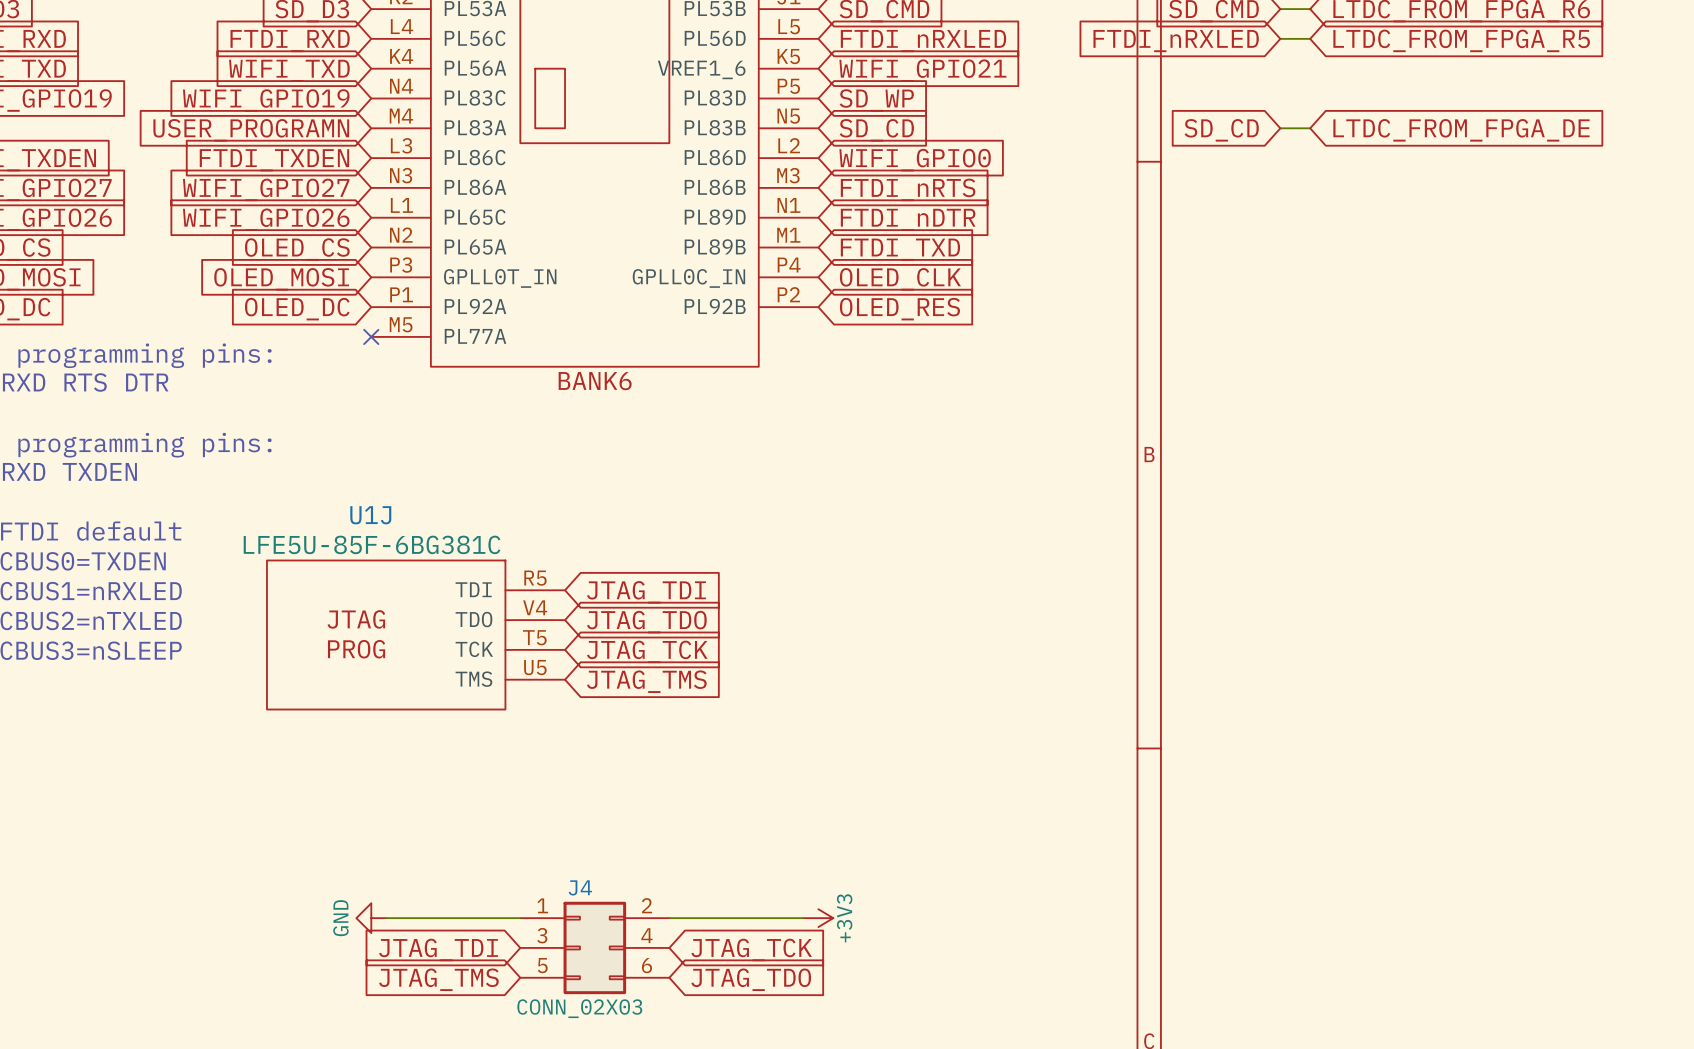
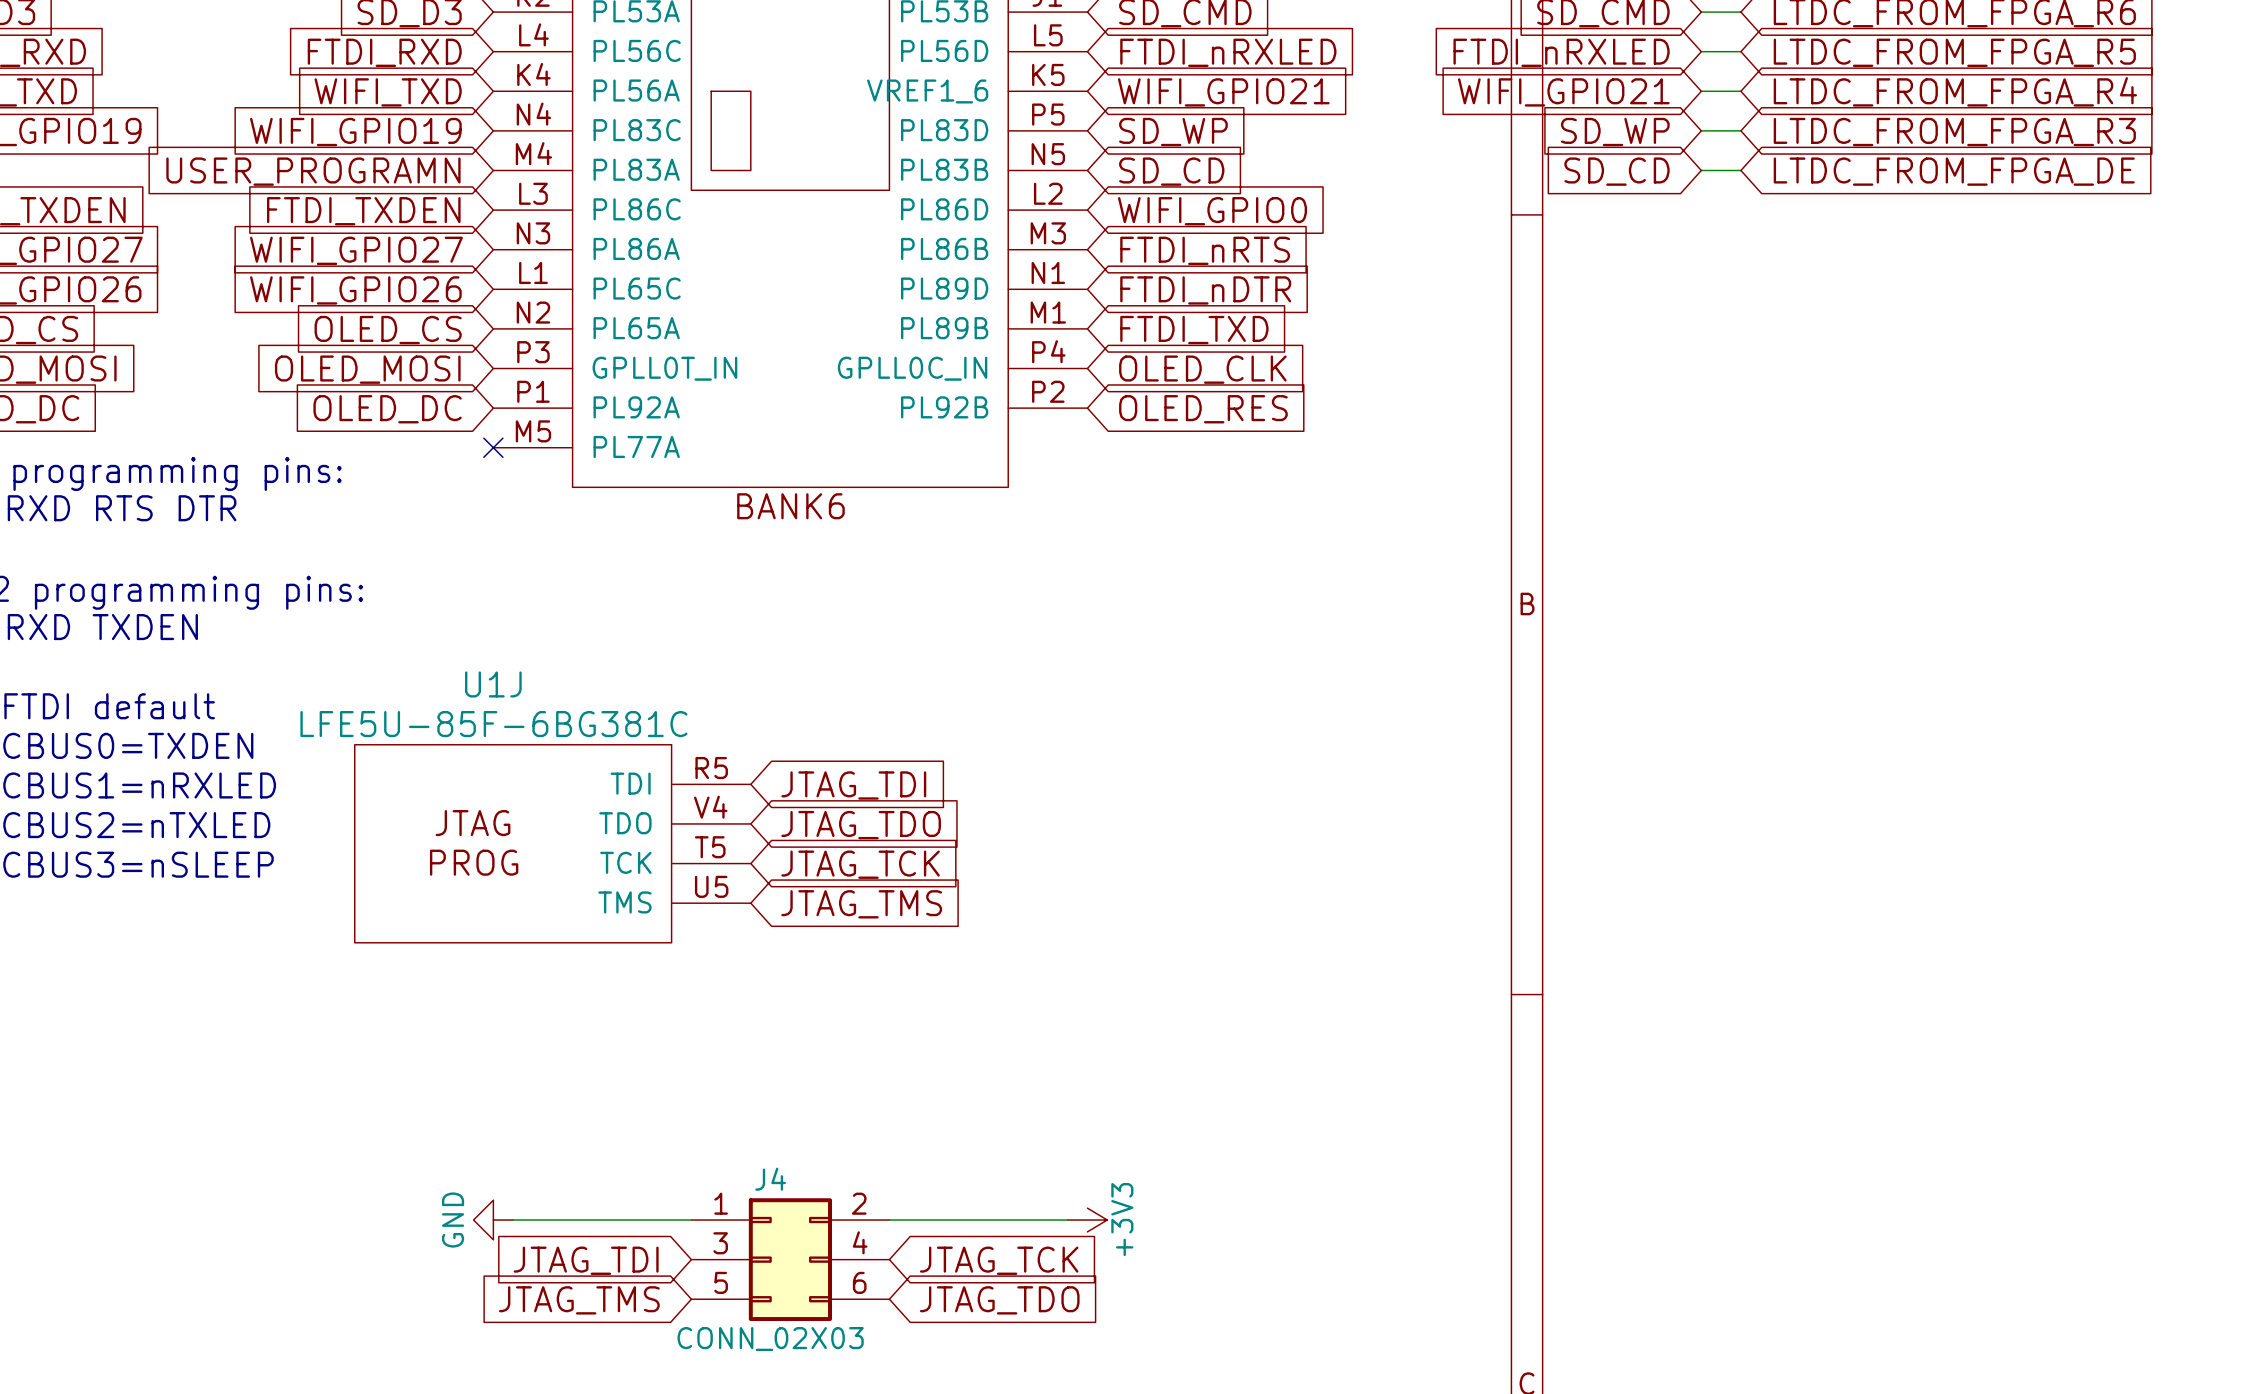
wire: none -> (1701, 91) (1740, 91)
global label: none -> WIFI_GPIO21 (1563, 92)
global label: none -> LTDC_FROM_FPGA_R4 (1955, 91)
wire: none -> (1701, 130) (1740, 130)
global label: none -> SD_WP (1615, 132)
global label: none -> LTDC_FROM_FPGA_R3 (1954, 132)

